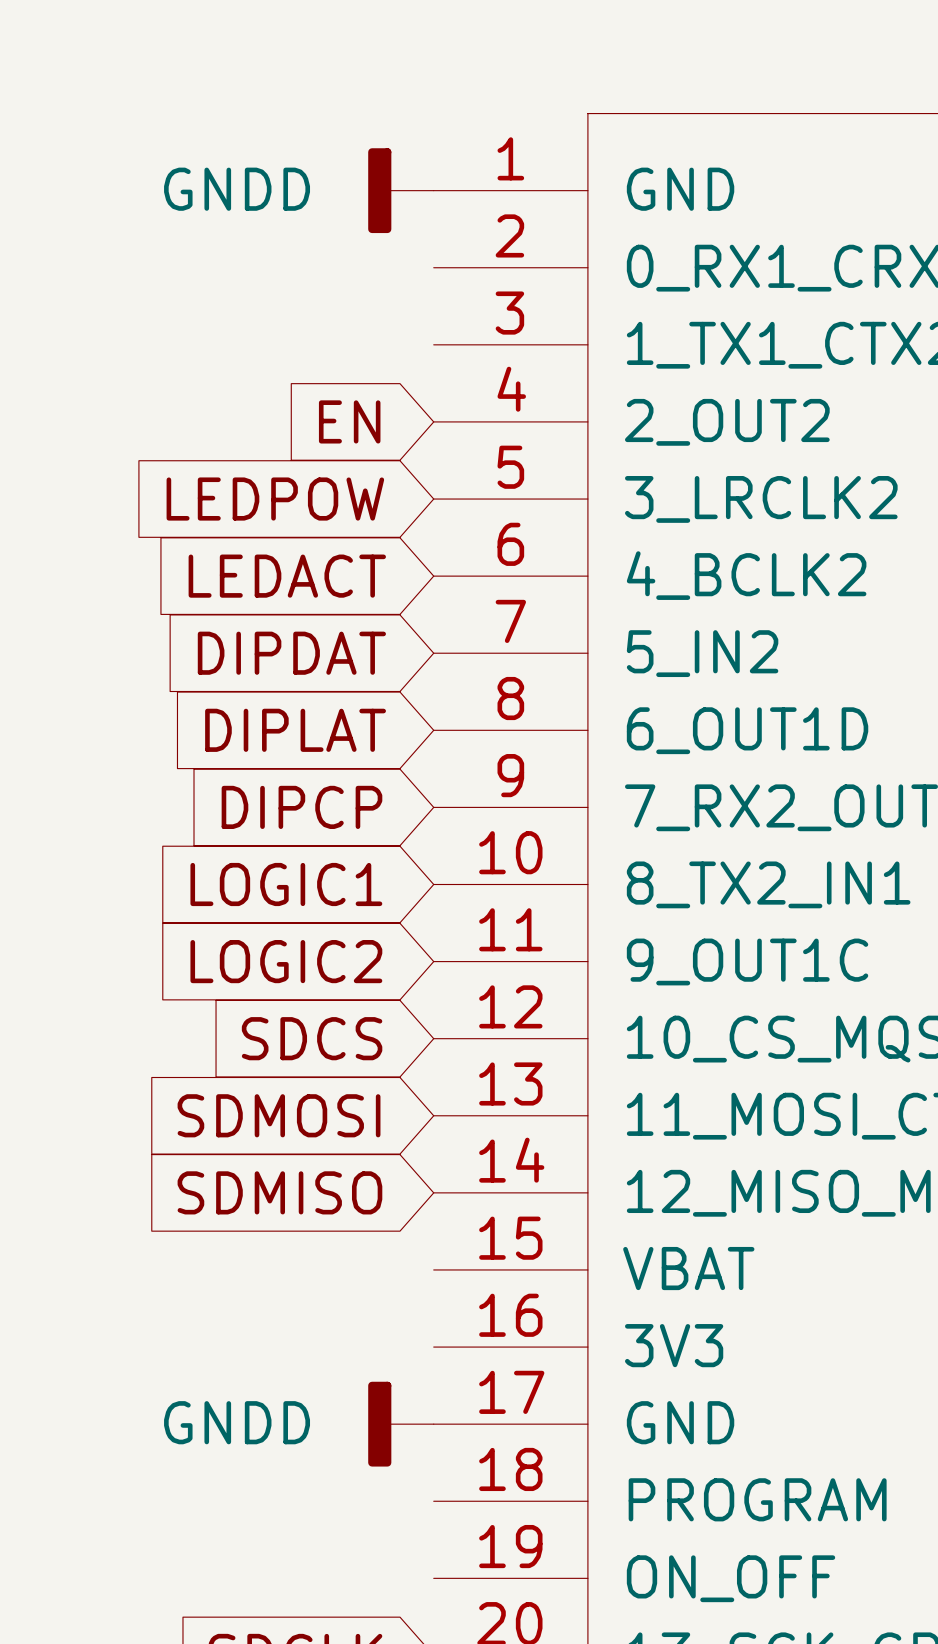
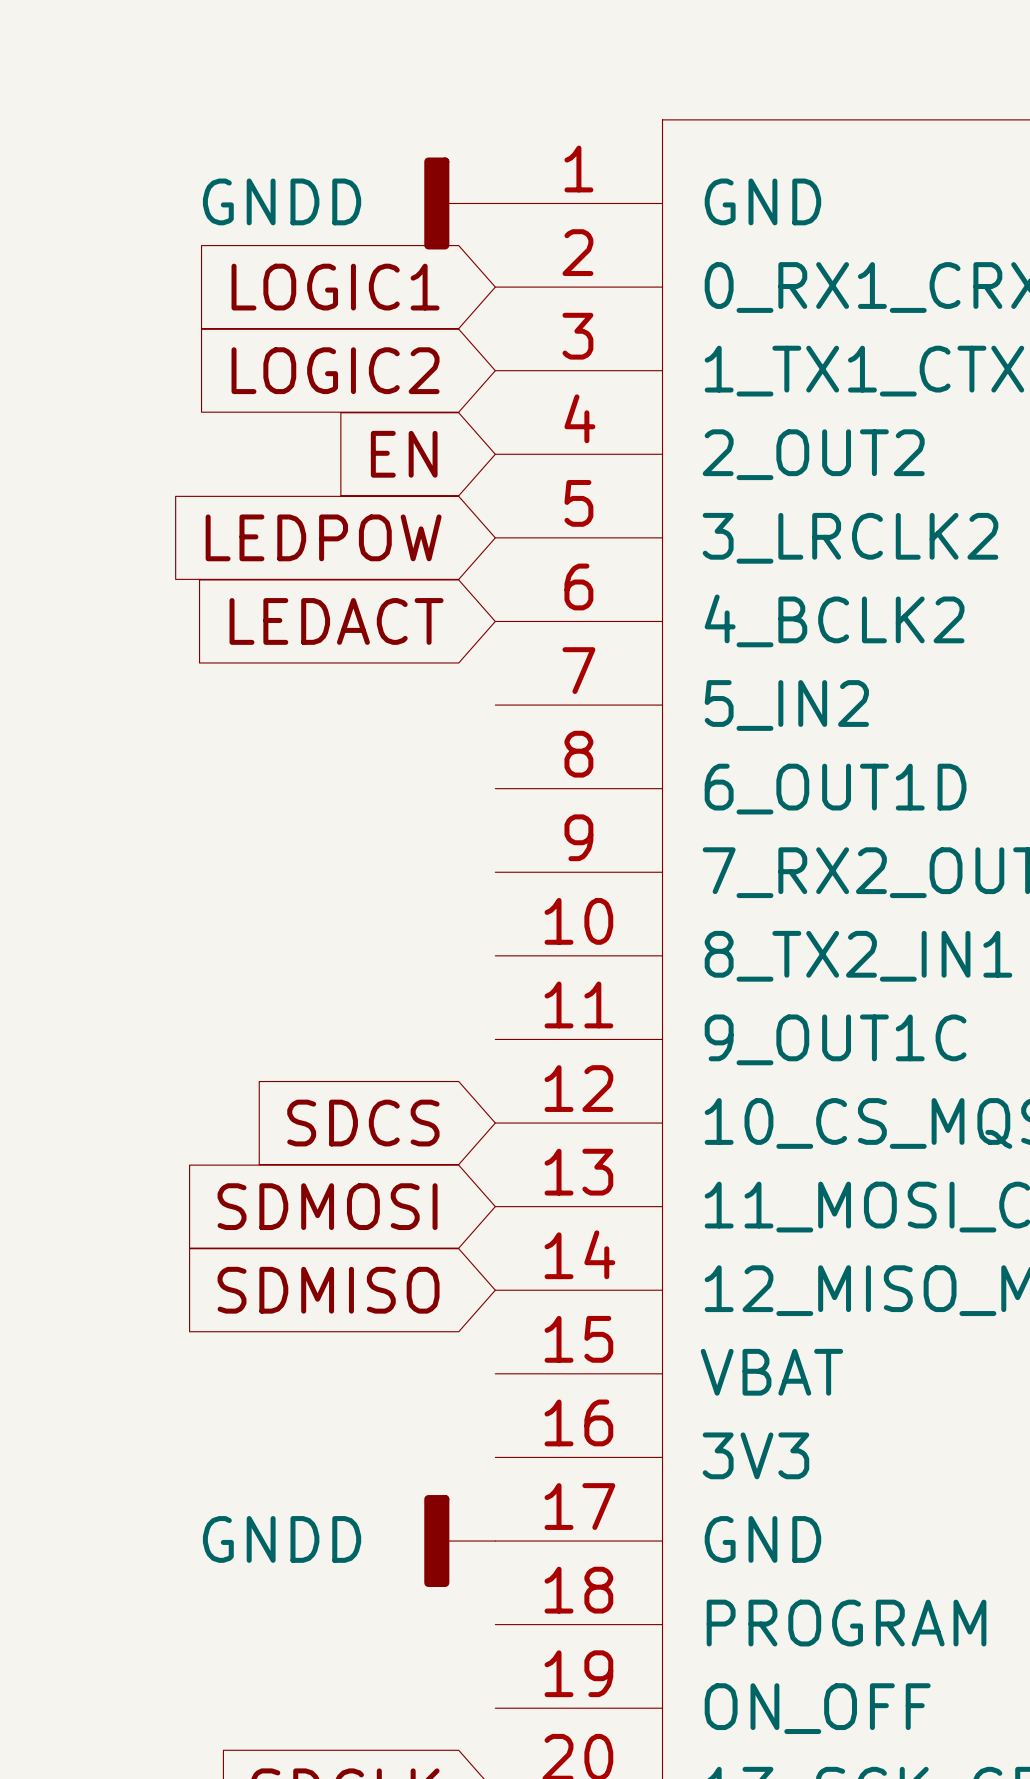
global label: DIPDAT (291, 653) -> none
global label: DIPLAT (295, 730) -> none
global label: DIPCP (301, 807) -> none
global label position: LOGIC1 (286, 884) -> LOGIC1 (335, 287)
global label position: LOGIC2 (286, 961) -> LOGIC2 (335, 370)

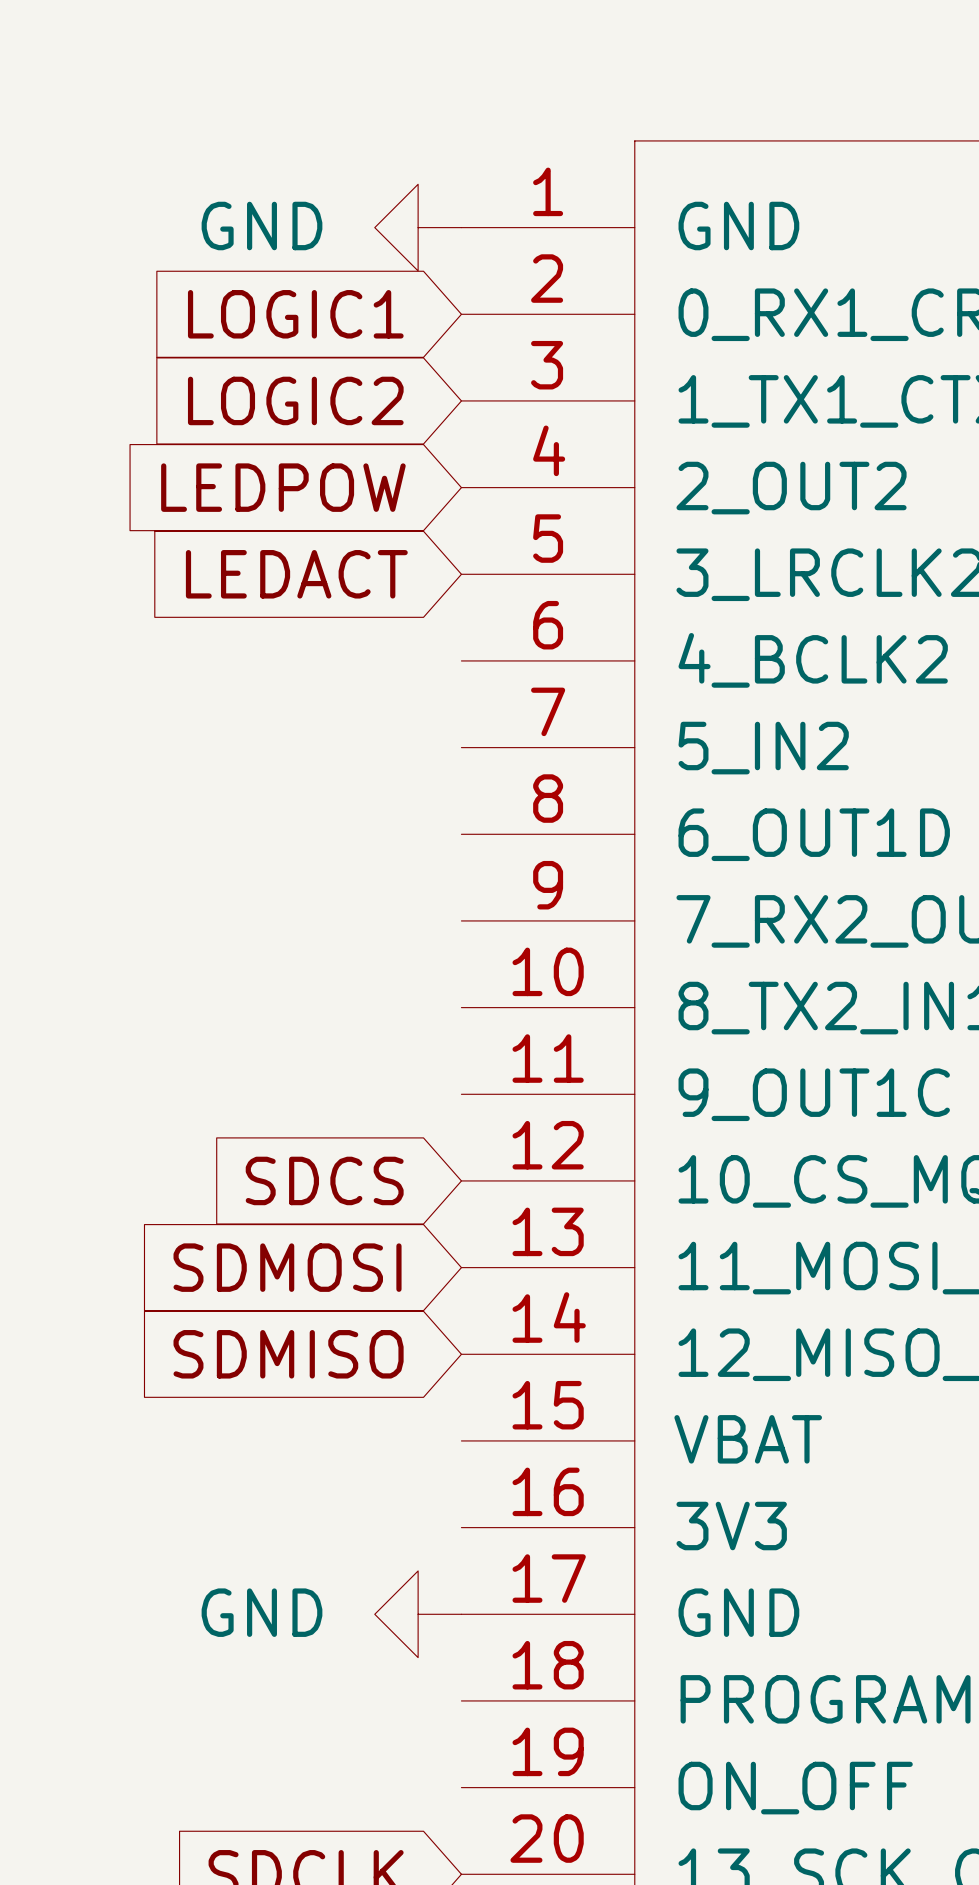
power symbol: GNDD (459, 203) -> GND (418, 227)
global label: EN (404, 454) -> LEDPOW (283, 487)
global label: LEDPOW (323, 537) -> LEDACT (296, 574)
global label: LEDACT (336, 621) -> none
power symbol: GNDD (459, 1541) -> GND (418, 1614)

